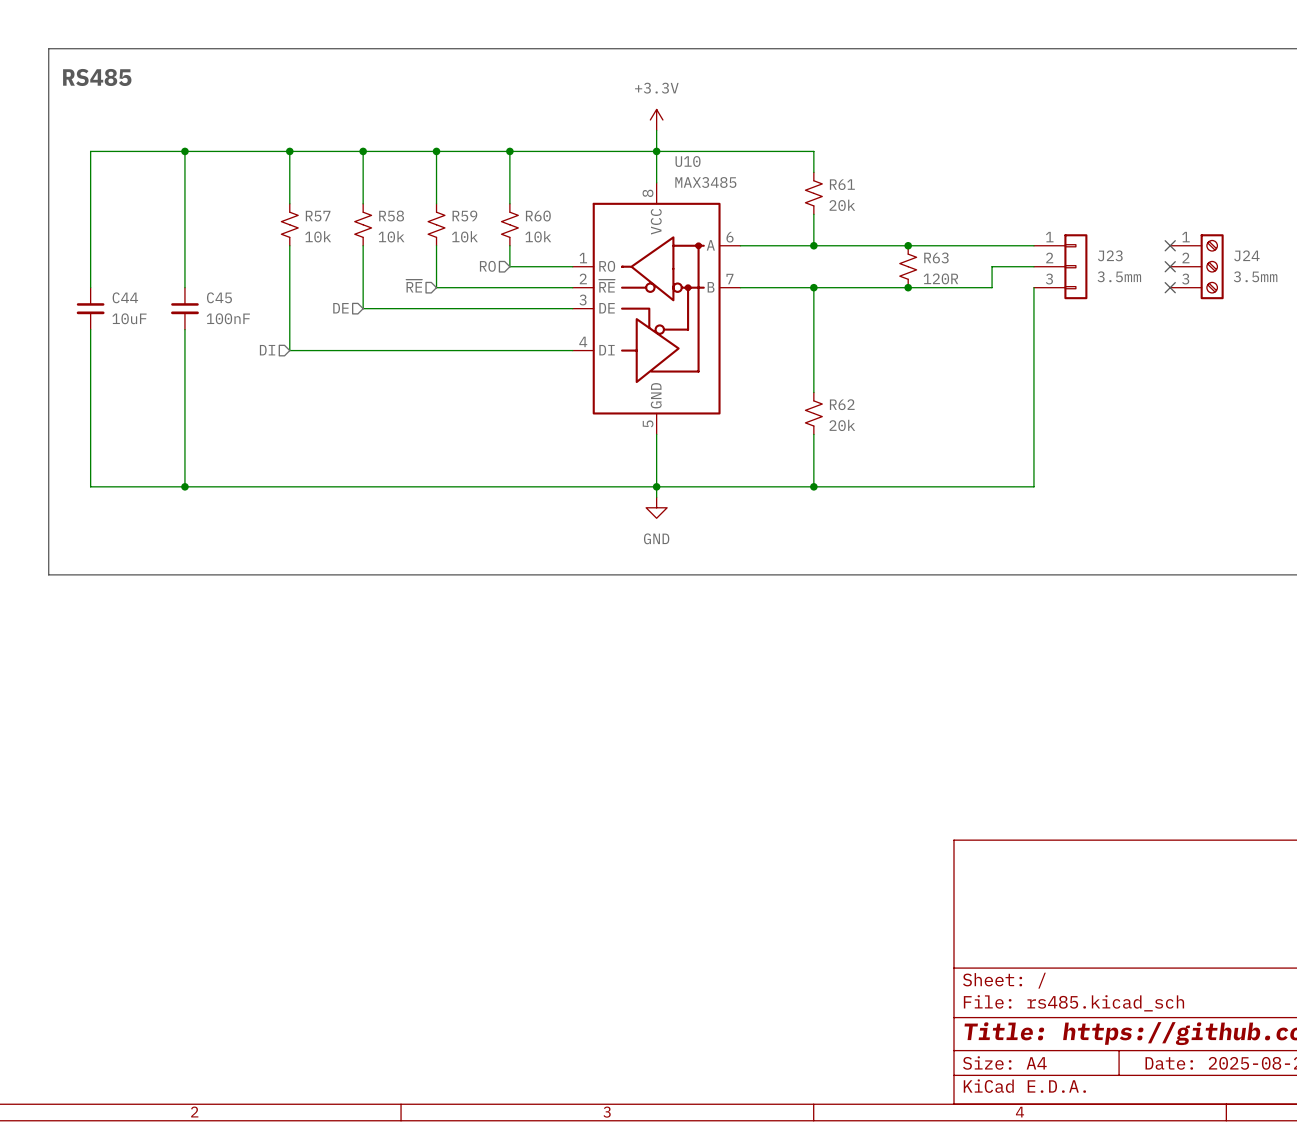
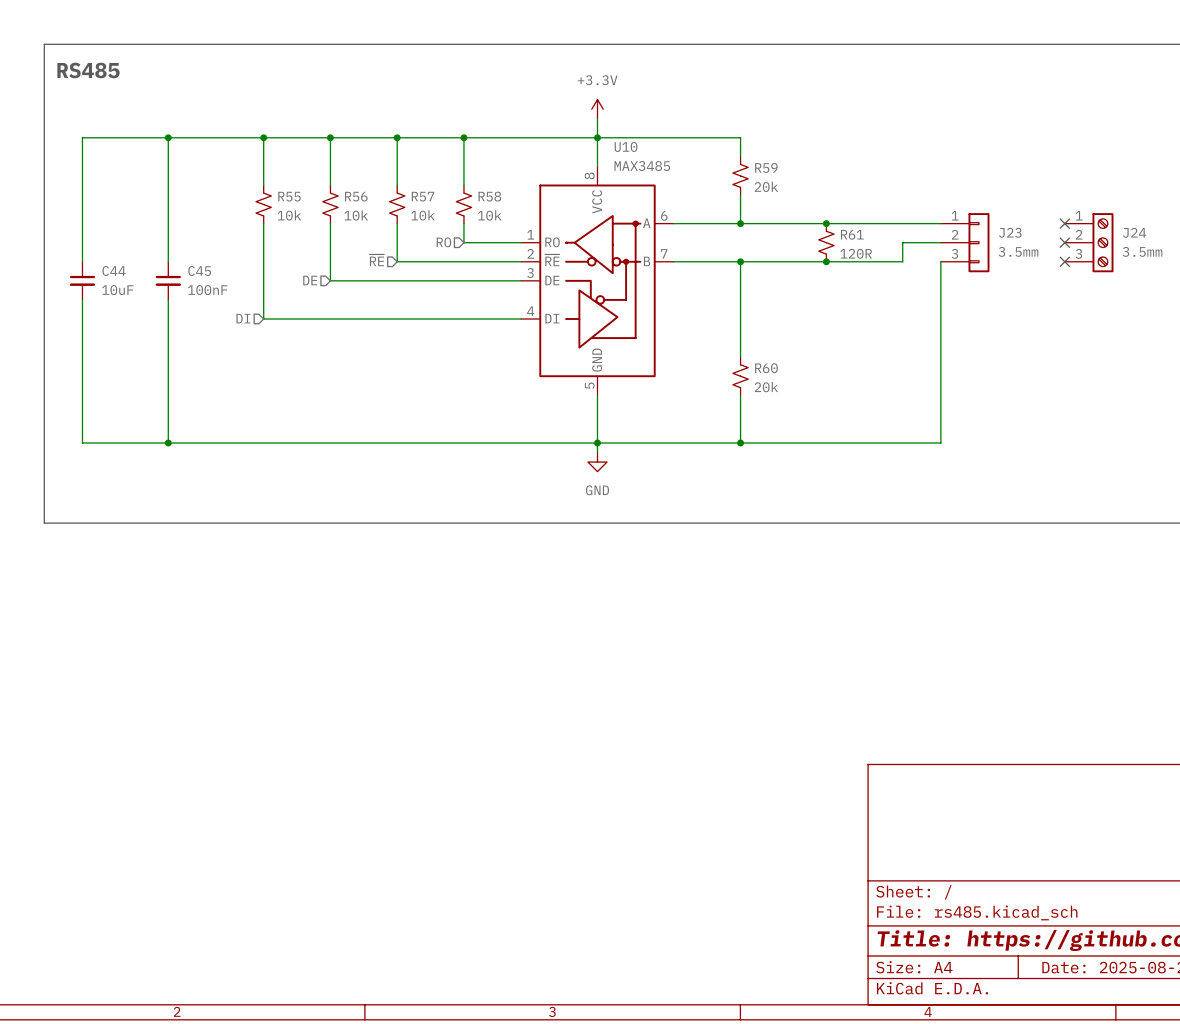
R61 name: R61 (842, 184) -> R59 (766, 167)
R57 name: R57 (318, 216) -> R55 (289, 196)
R58 name: R58 (391, 216) -> R56 (356, 196)
R59 name: R59 (464, 216) -> R57 (423, 196)
R60 name: R60 (538, 216) -> R58 (489, 196)
R63 name: R63 (936, 257) -> R61 (852, 234)
R62 name: R62 (842, 404) -> R60 (766, 368)

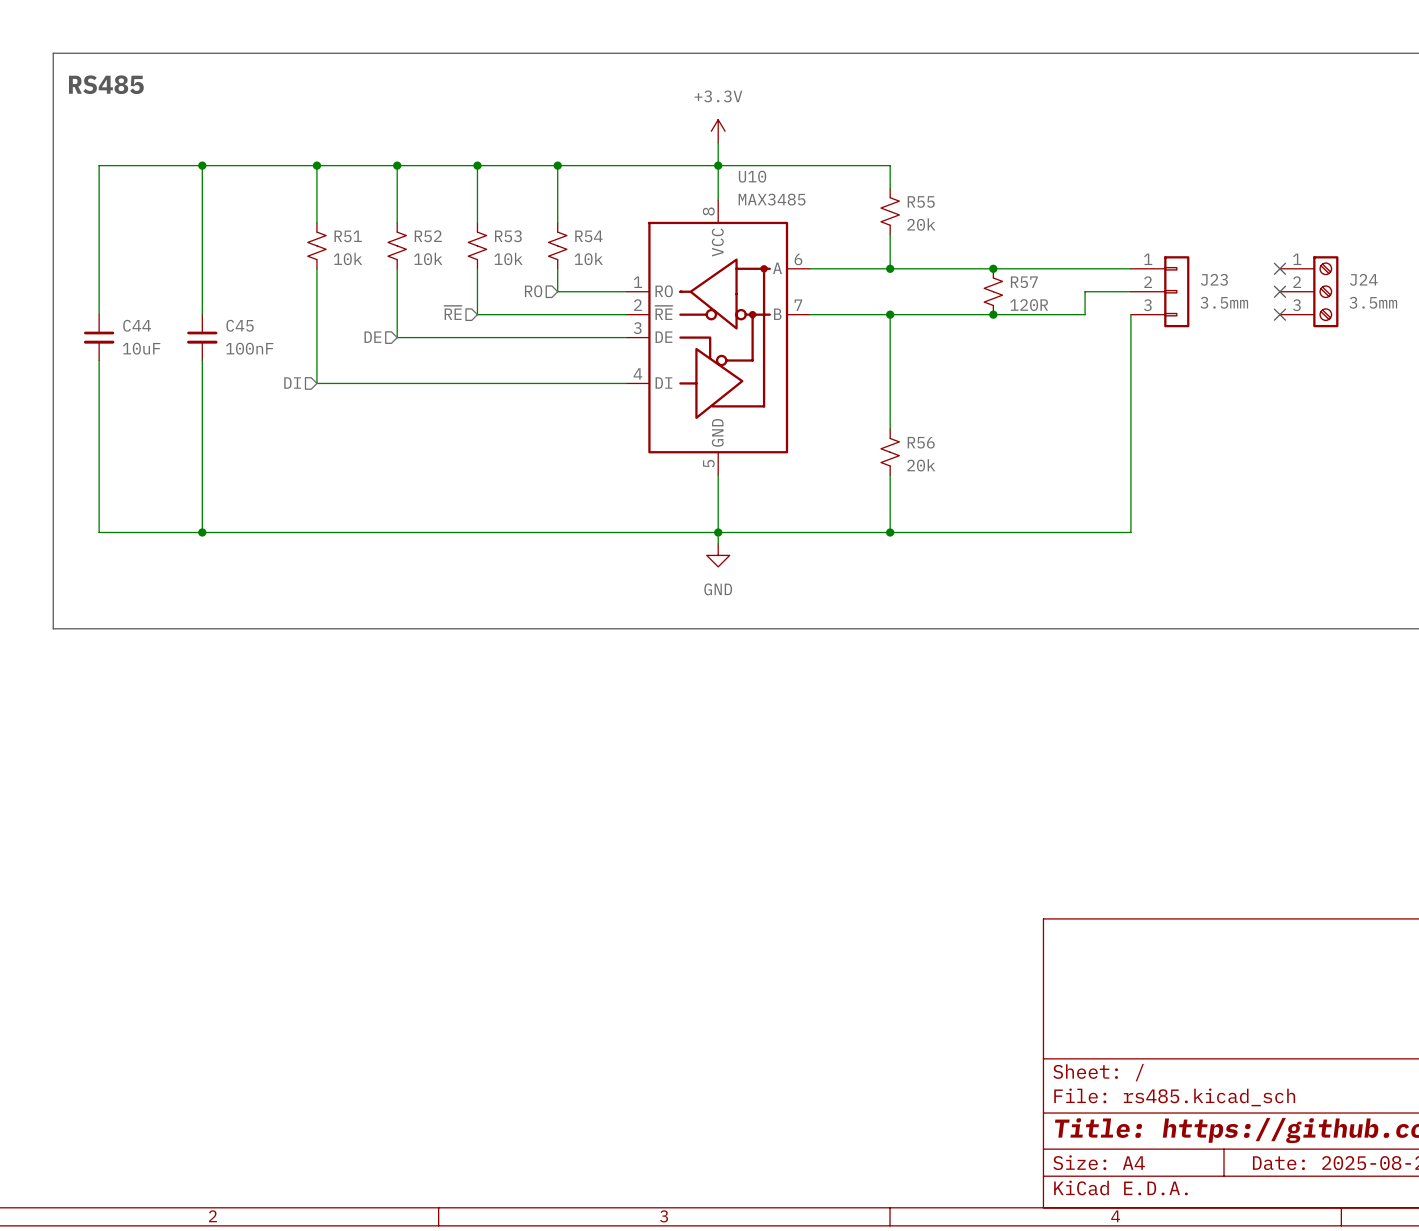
R59 name: R59 (766, 167) -> R55 (921, 201)
R55 name: R55 (289, 196) -> R51 (348, 236)
R56 name: R56 (356, 196) -> R52 (428, 236)
R57 name: R57 (423, 196) -> R53 (508, 236)
R58 name: R58 (489, 196) -> R54 (588, 236)
R61 name: R61 (852, 234) -> R57 (1024, 282)
R60 name: R60 (766, 368) -> R56 (921, 442)

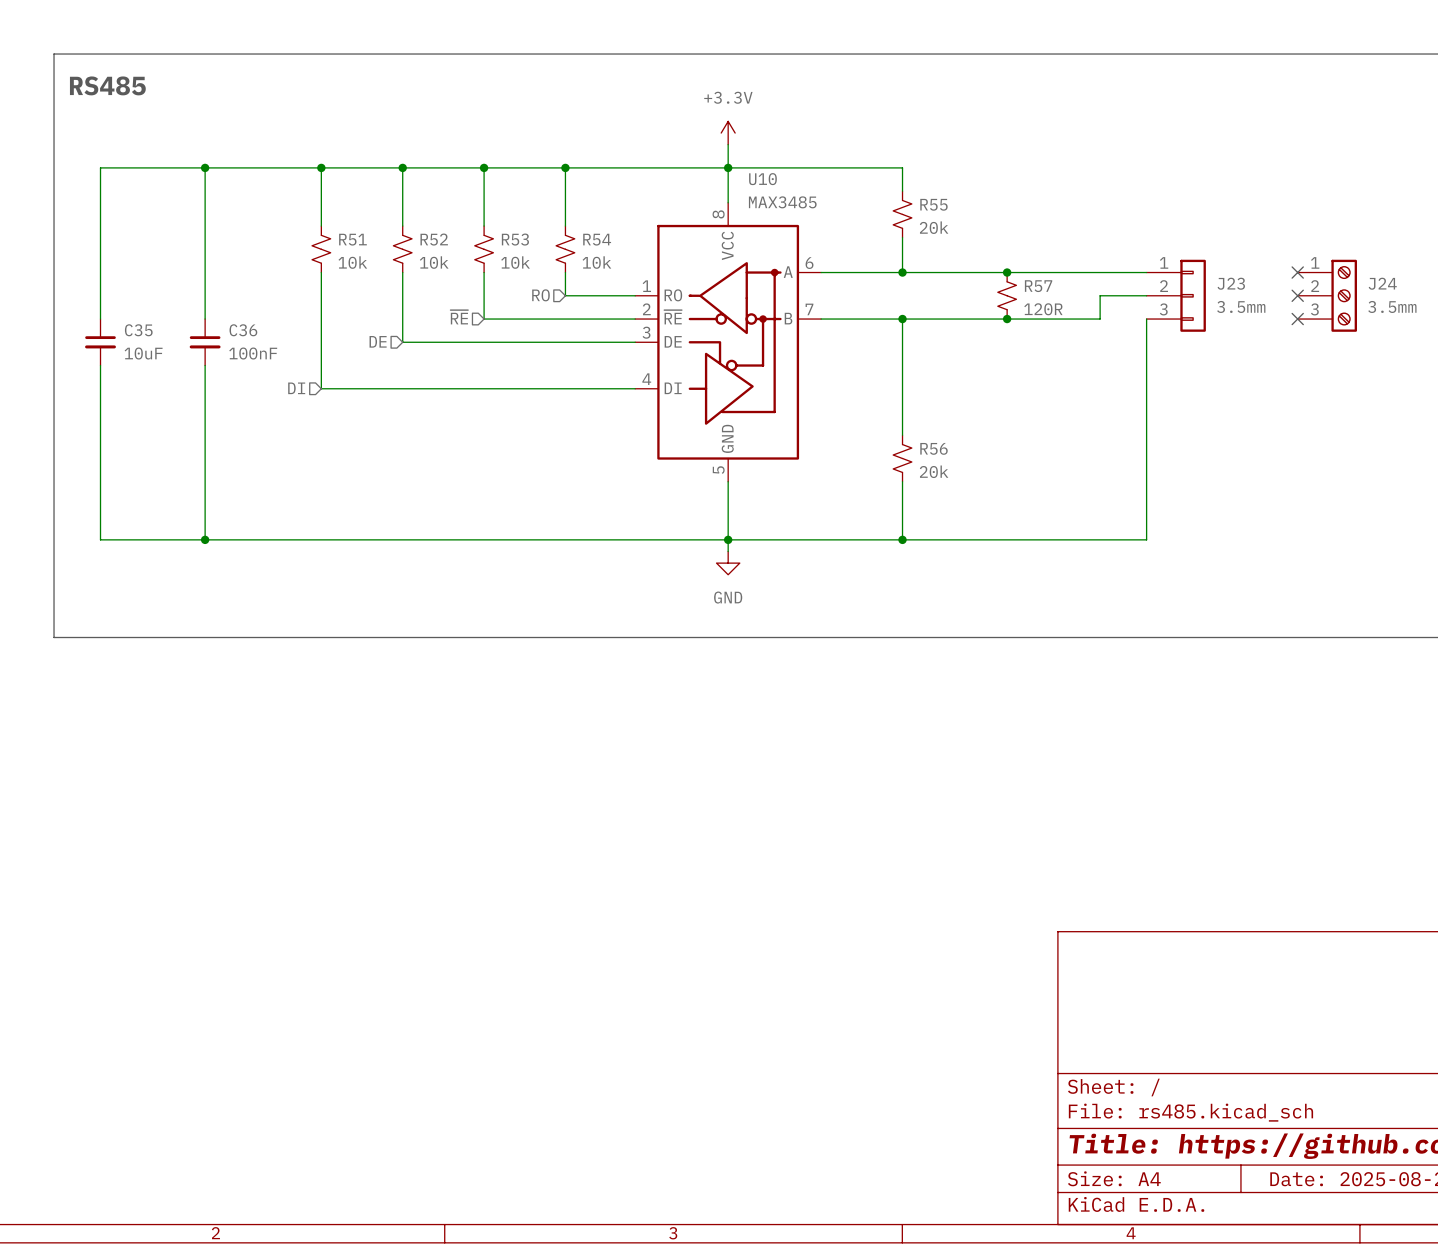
C44 name: C44 (137, 325) -> C35 (138, 330)
C45 name: C45 (240, 325) -> C36 (243, 330)

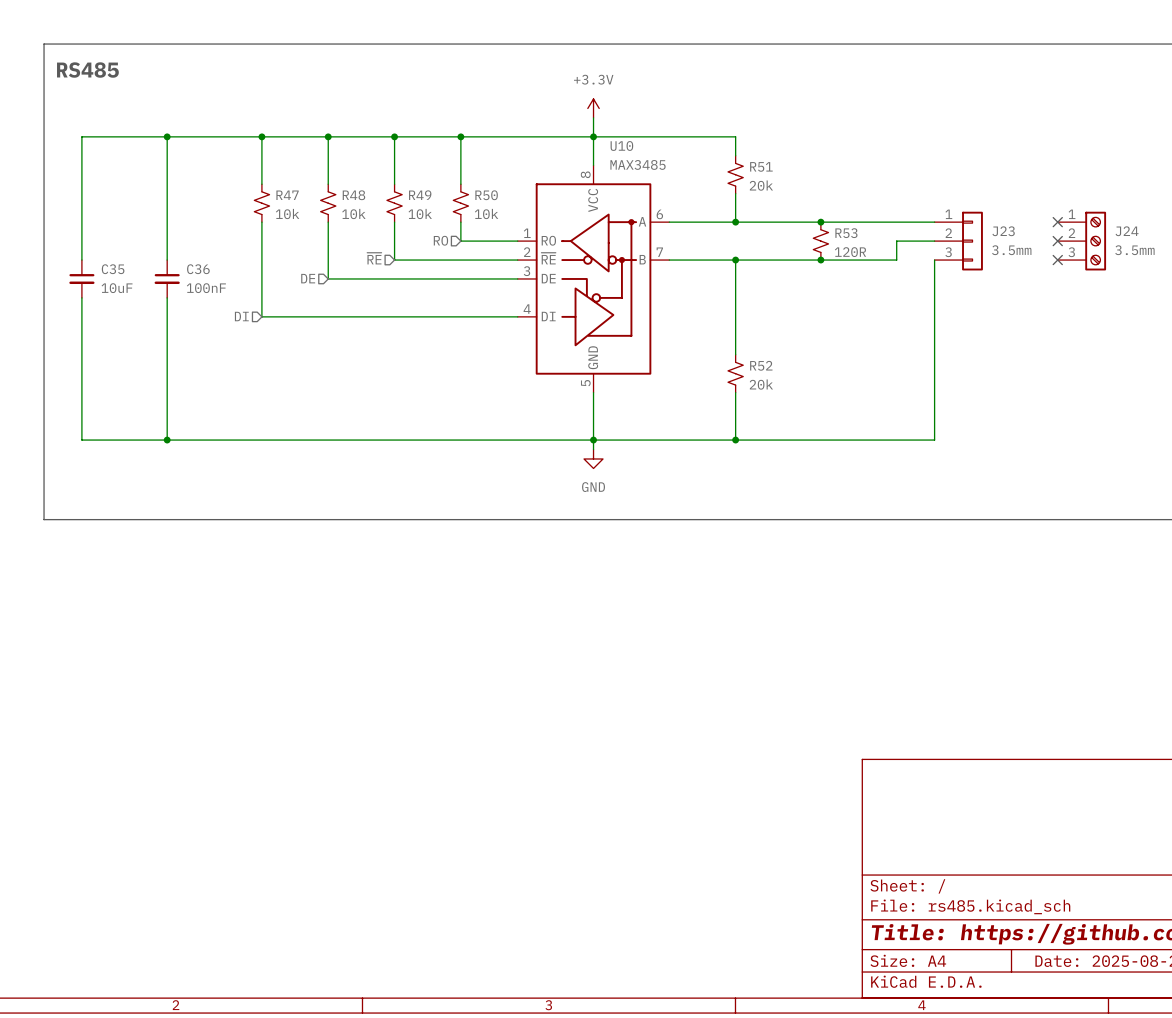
R55 name: R55 (933, 204) -> R51 (761, 166)
R51 name: R51 (352, 239) -> R47 (287, 195)
R52 name: R52 (434, 239) -> R48 (353, 195)
R53 name: R53 (515, 239) -> R49 (420, 195)
R54 name: R54 (597, 239) -> R50 (486, 195)
R57 name: R57 (1038, 286) -> R53 (846, 233)
R56 name: R56 (933, 448) -> R52 (761, 365)

